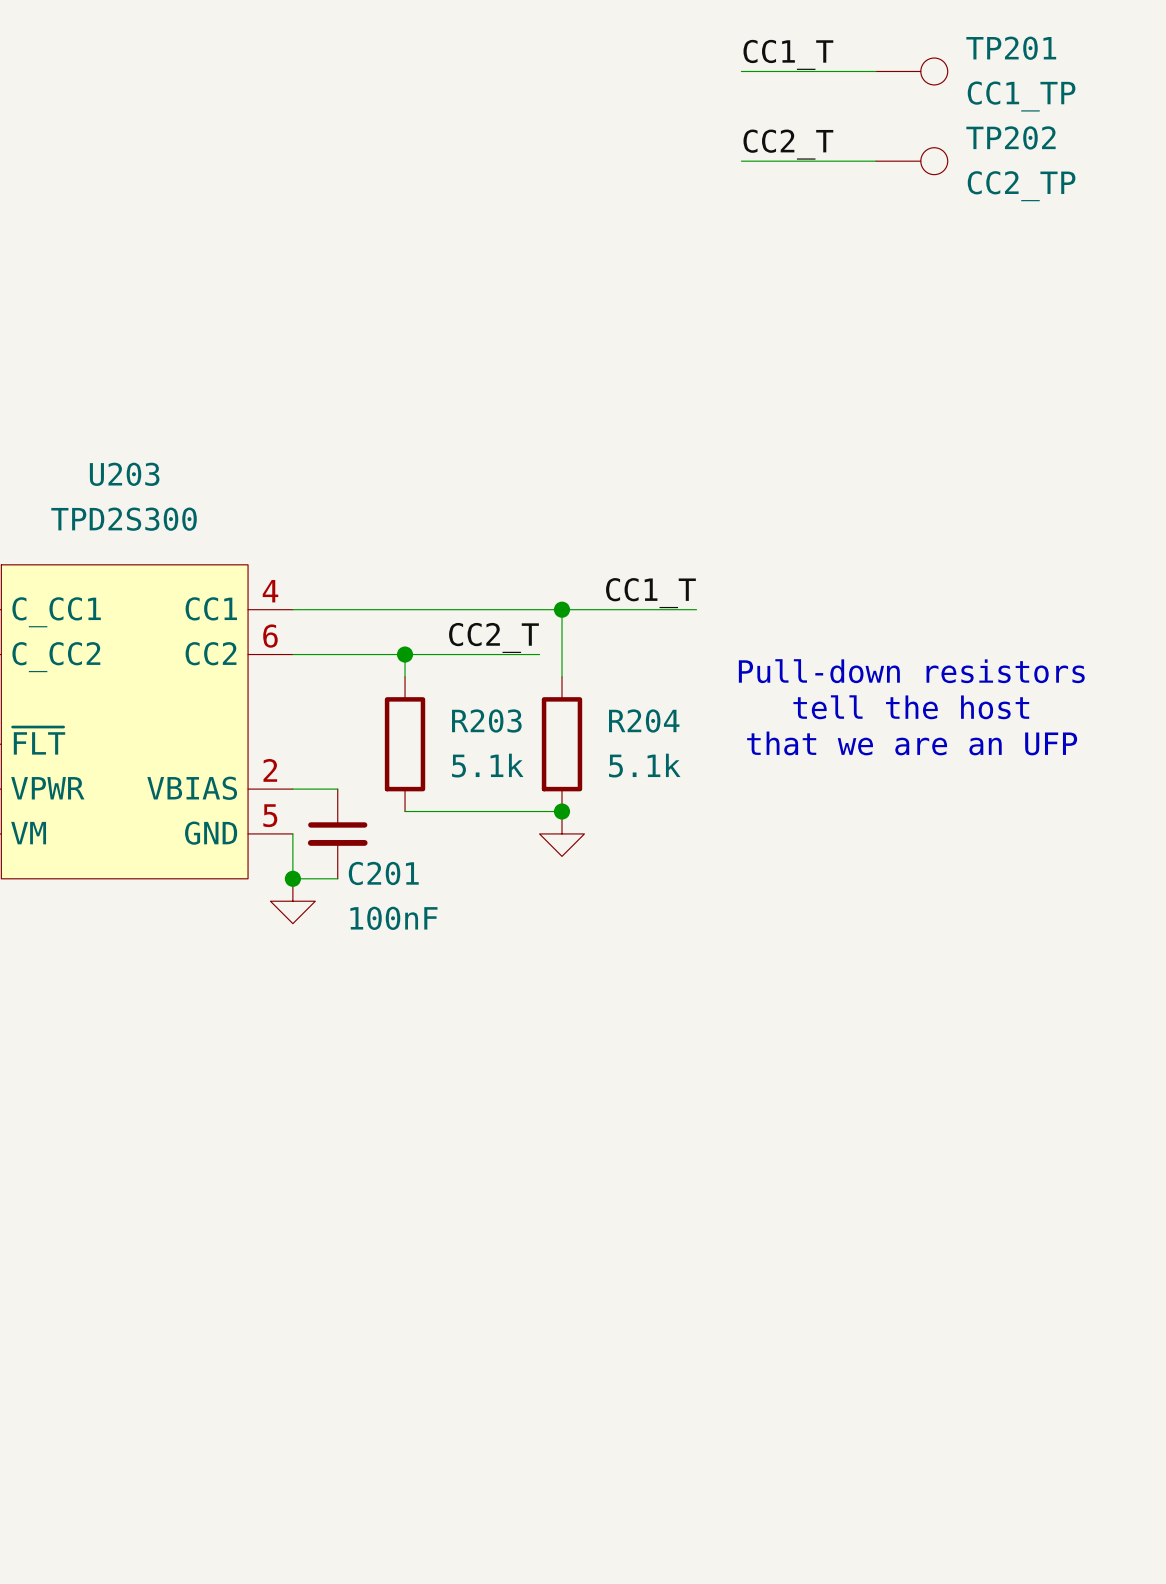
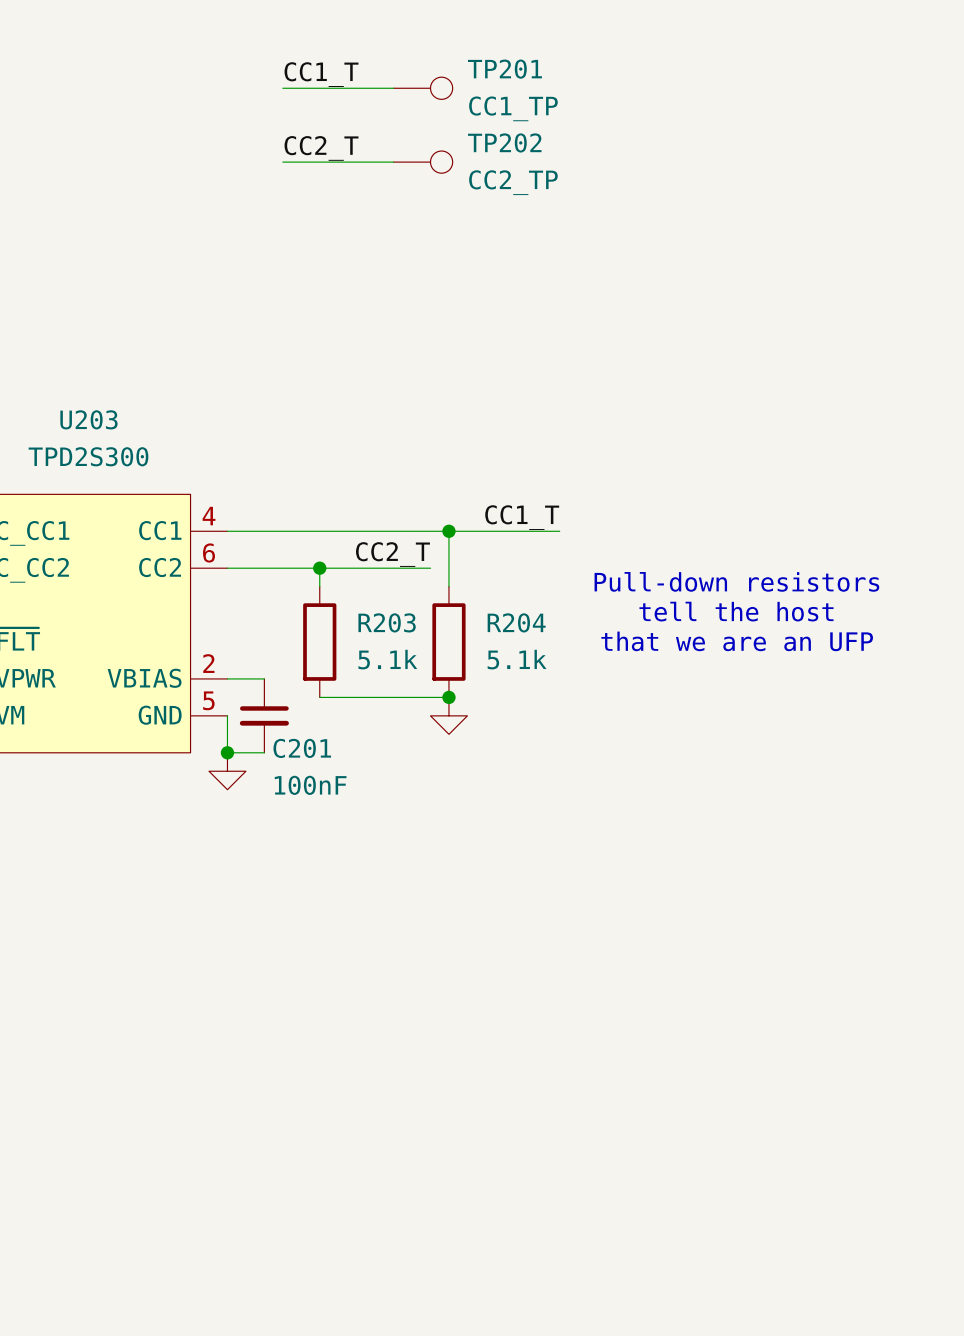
label position: CC1_T (788, 54) -> CC1_T (321, 74)
wire: (741, 71) (875, 71) -> (282, 88) (393, 88)
TP201 position: (911, 71) -> (423, 88)
label position: CC2_T (788, 144) -> CC2_T (321, 148)
wire: (741, 161) (875, 161) -> (282, 162) (393, 162)
TP202 position: (911, 161) -> (423, 162)

